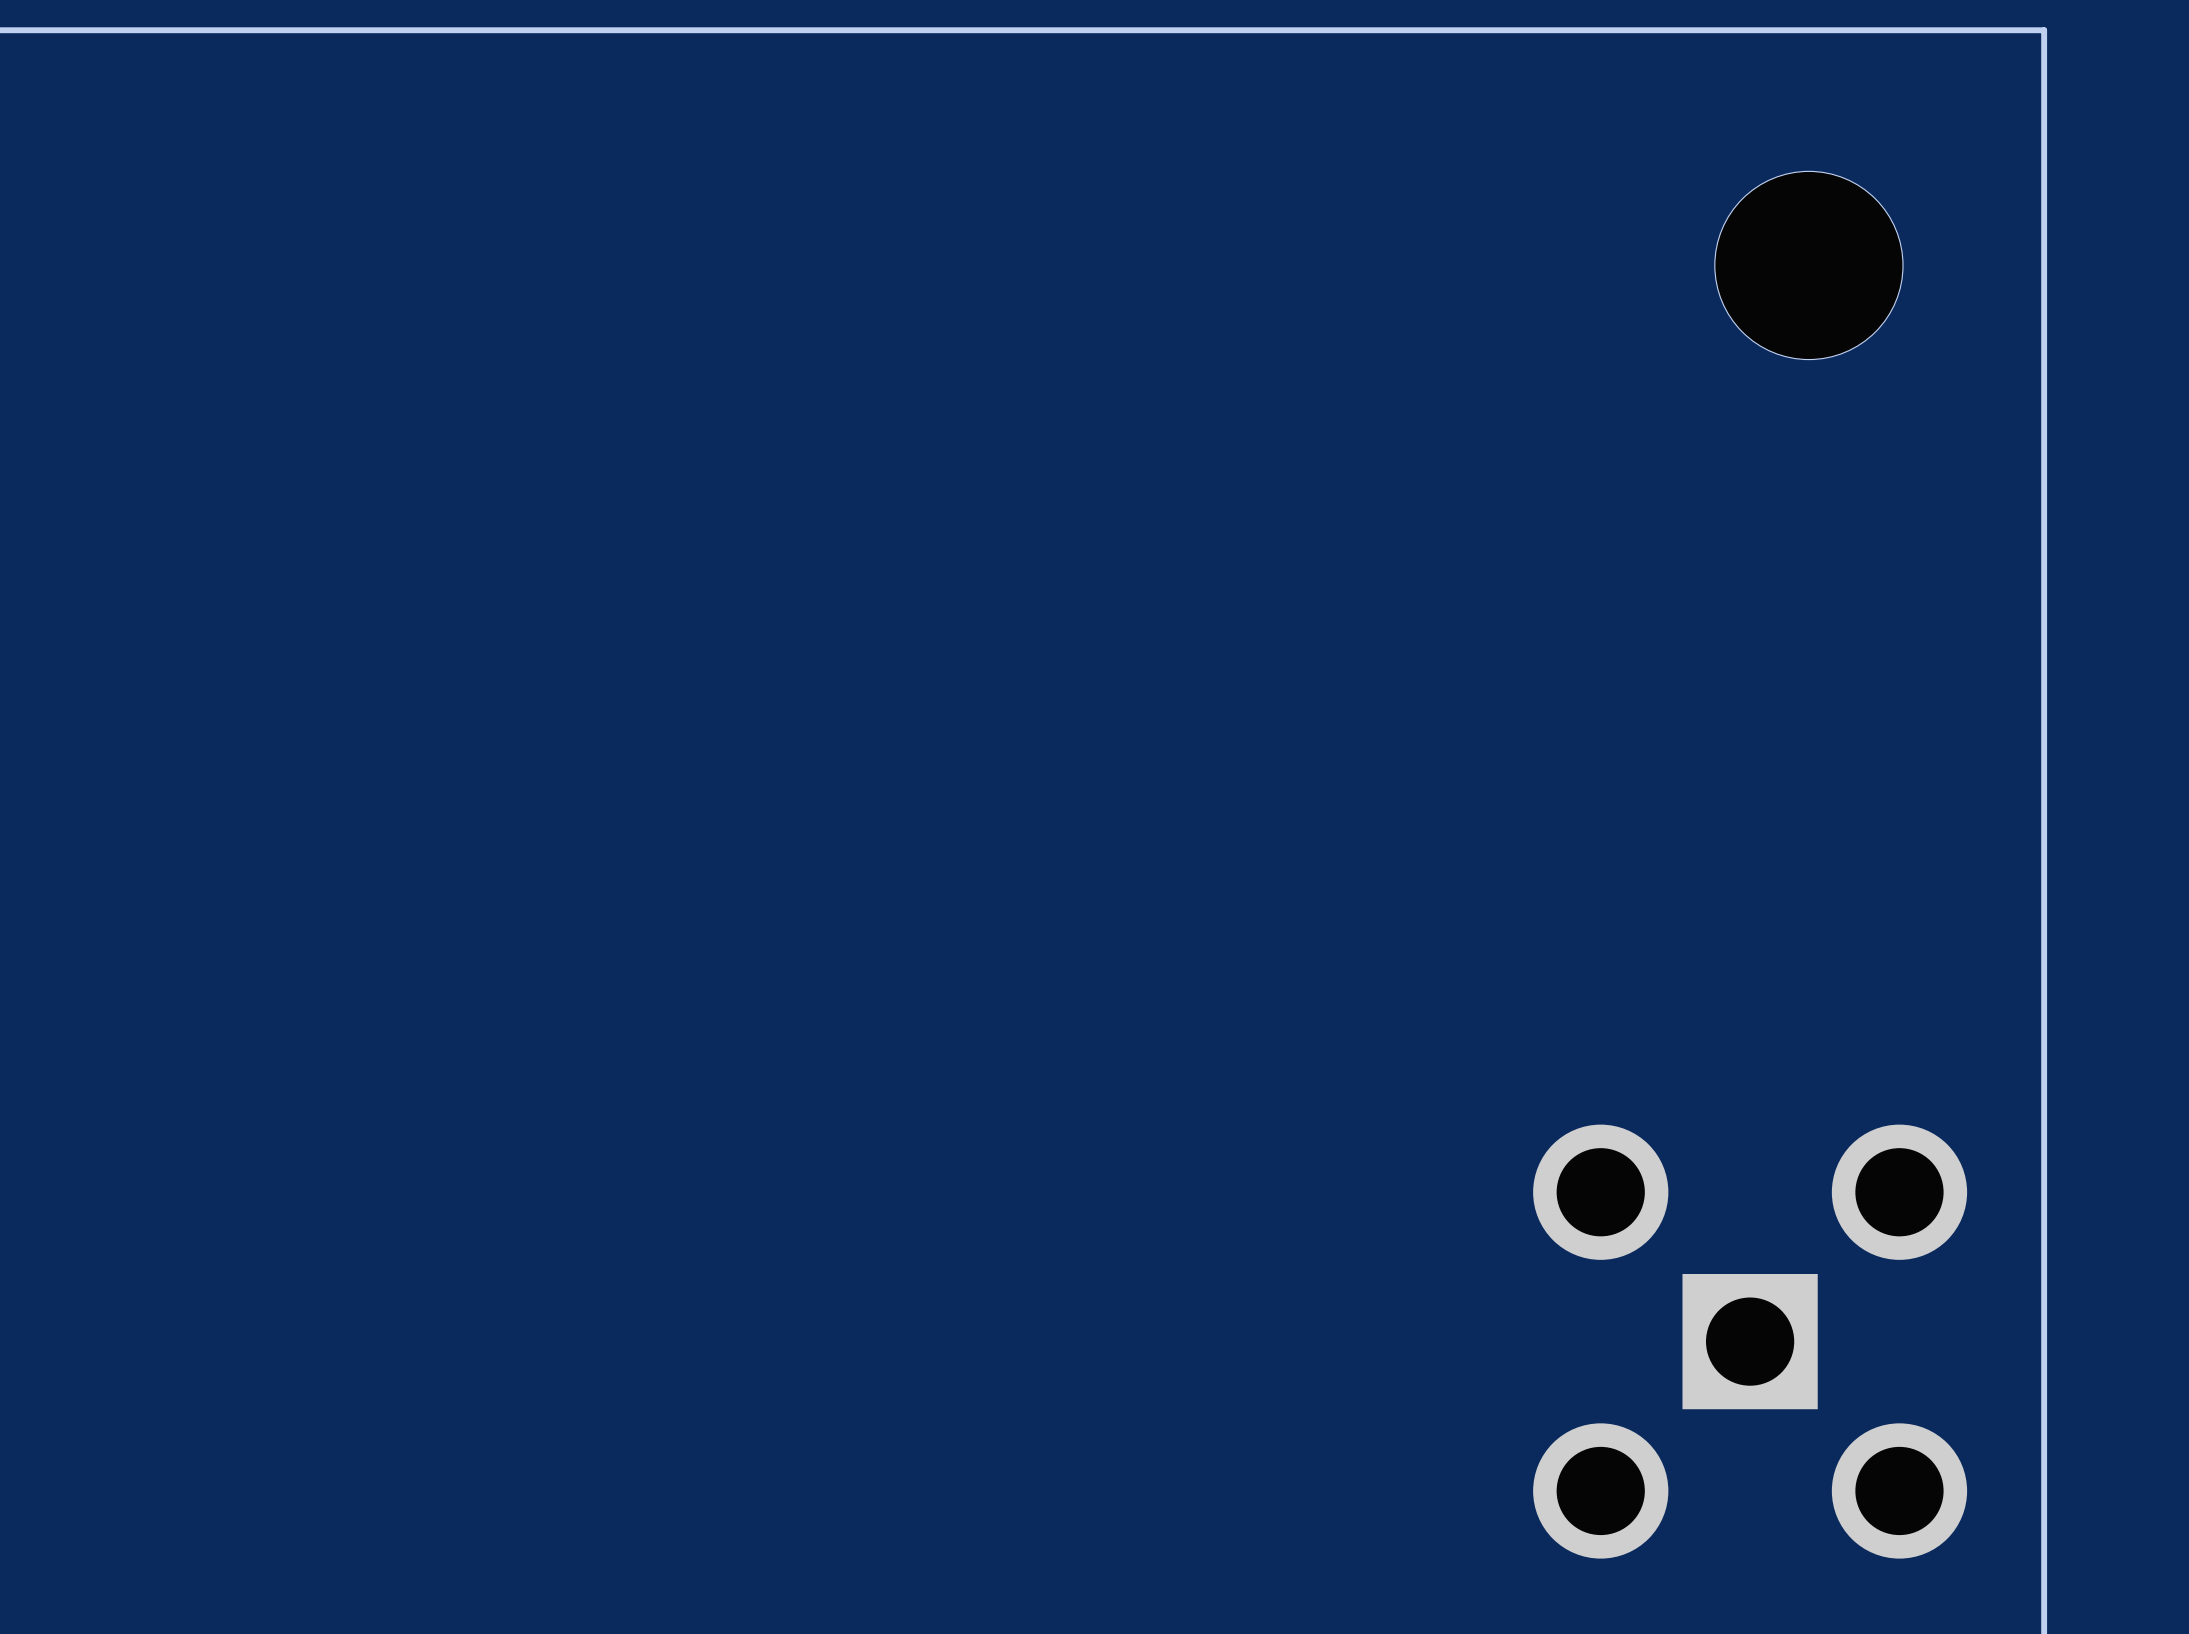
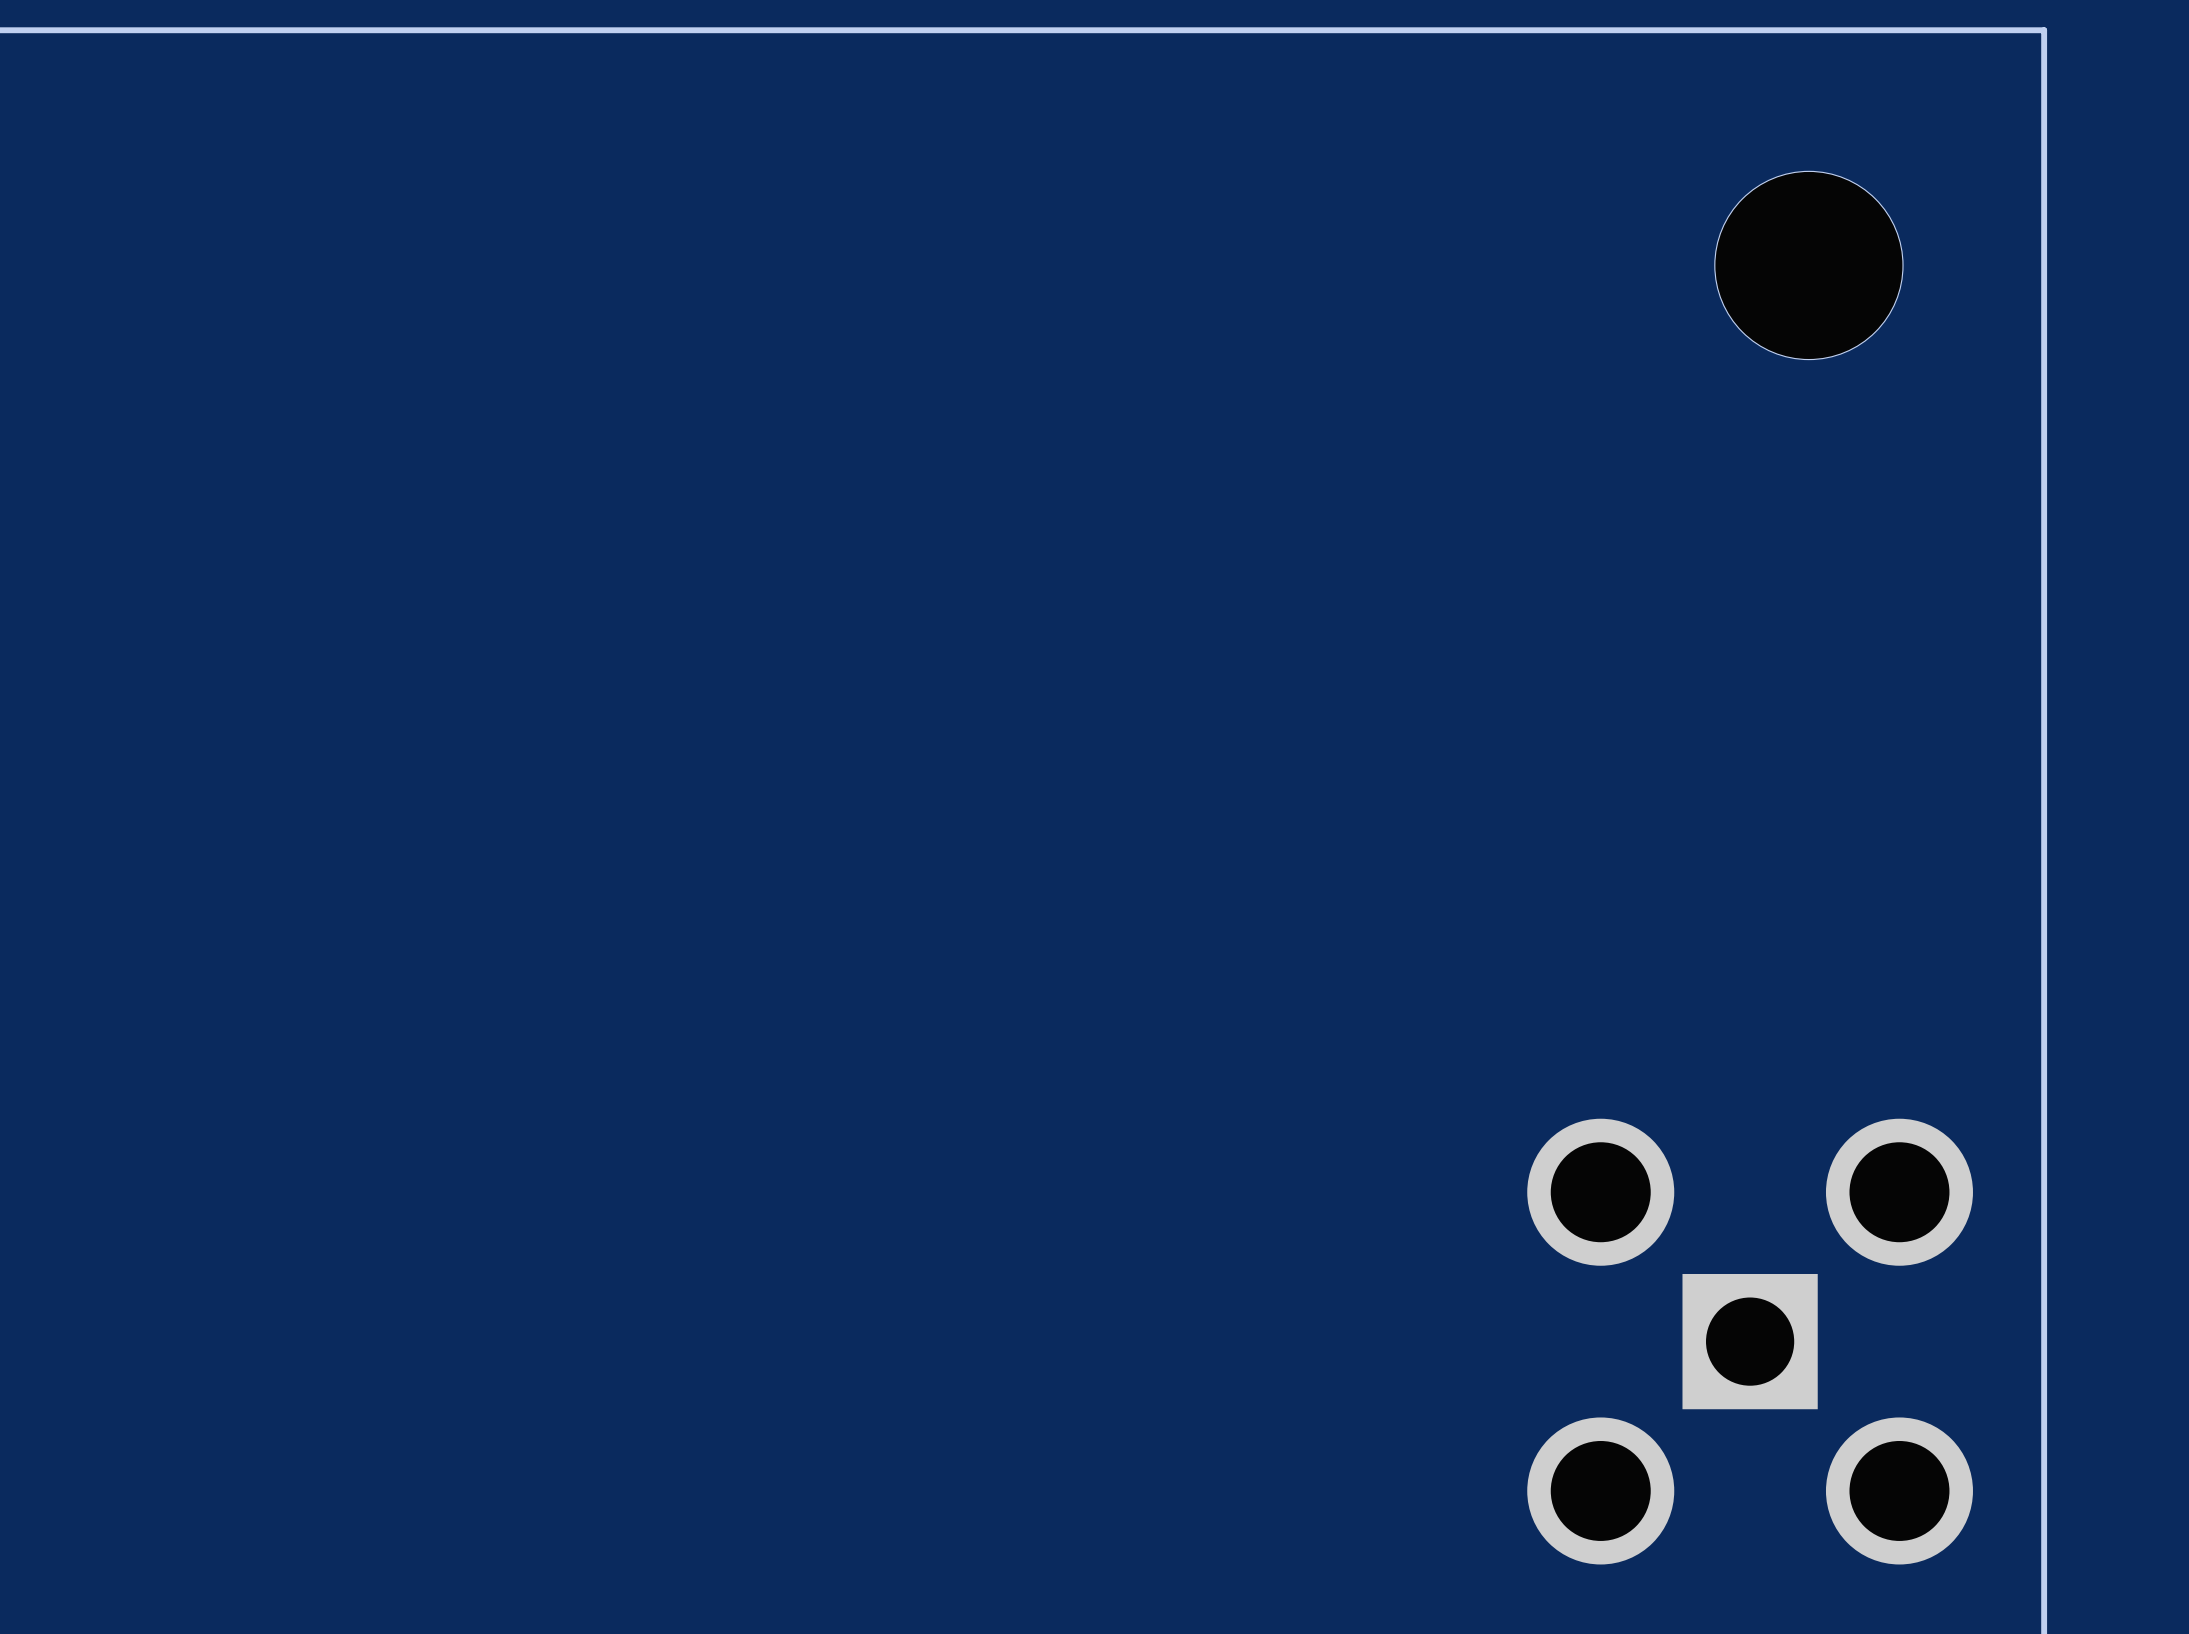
part footprint: [1533, 1124, 1968, 1559] -> [1527, 1118, 1973, 1565]

